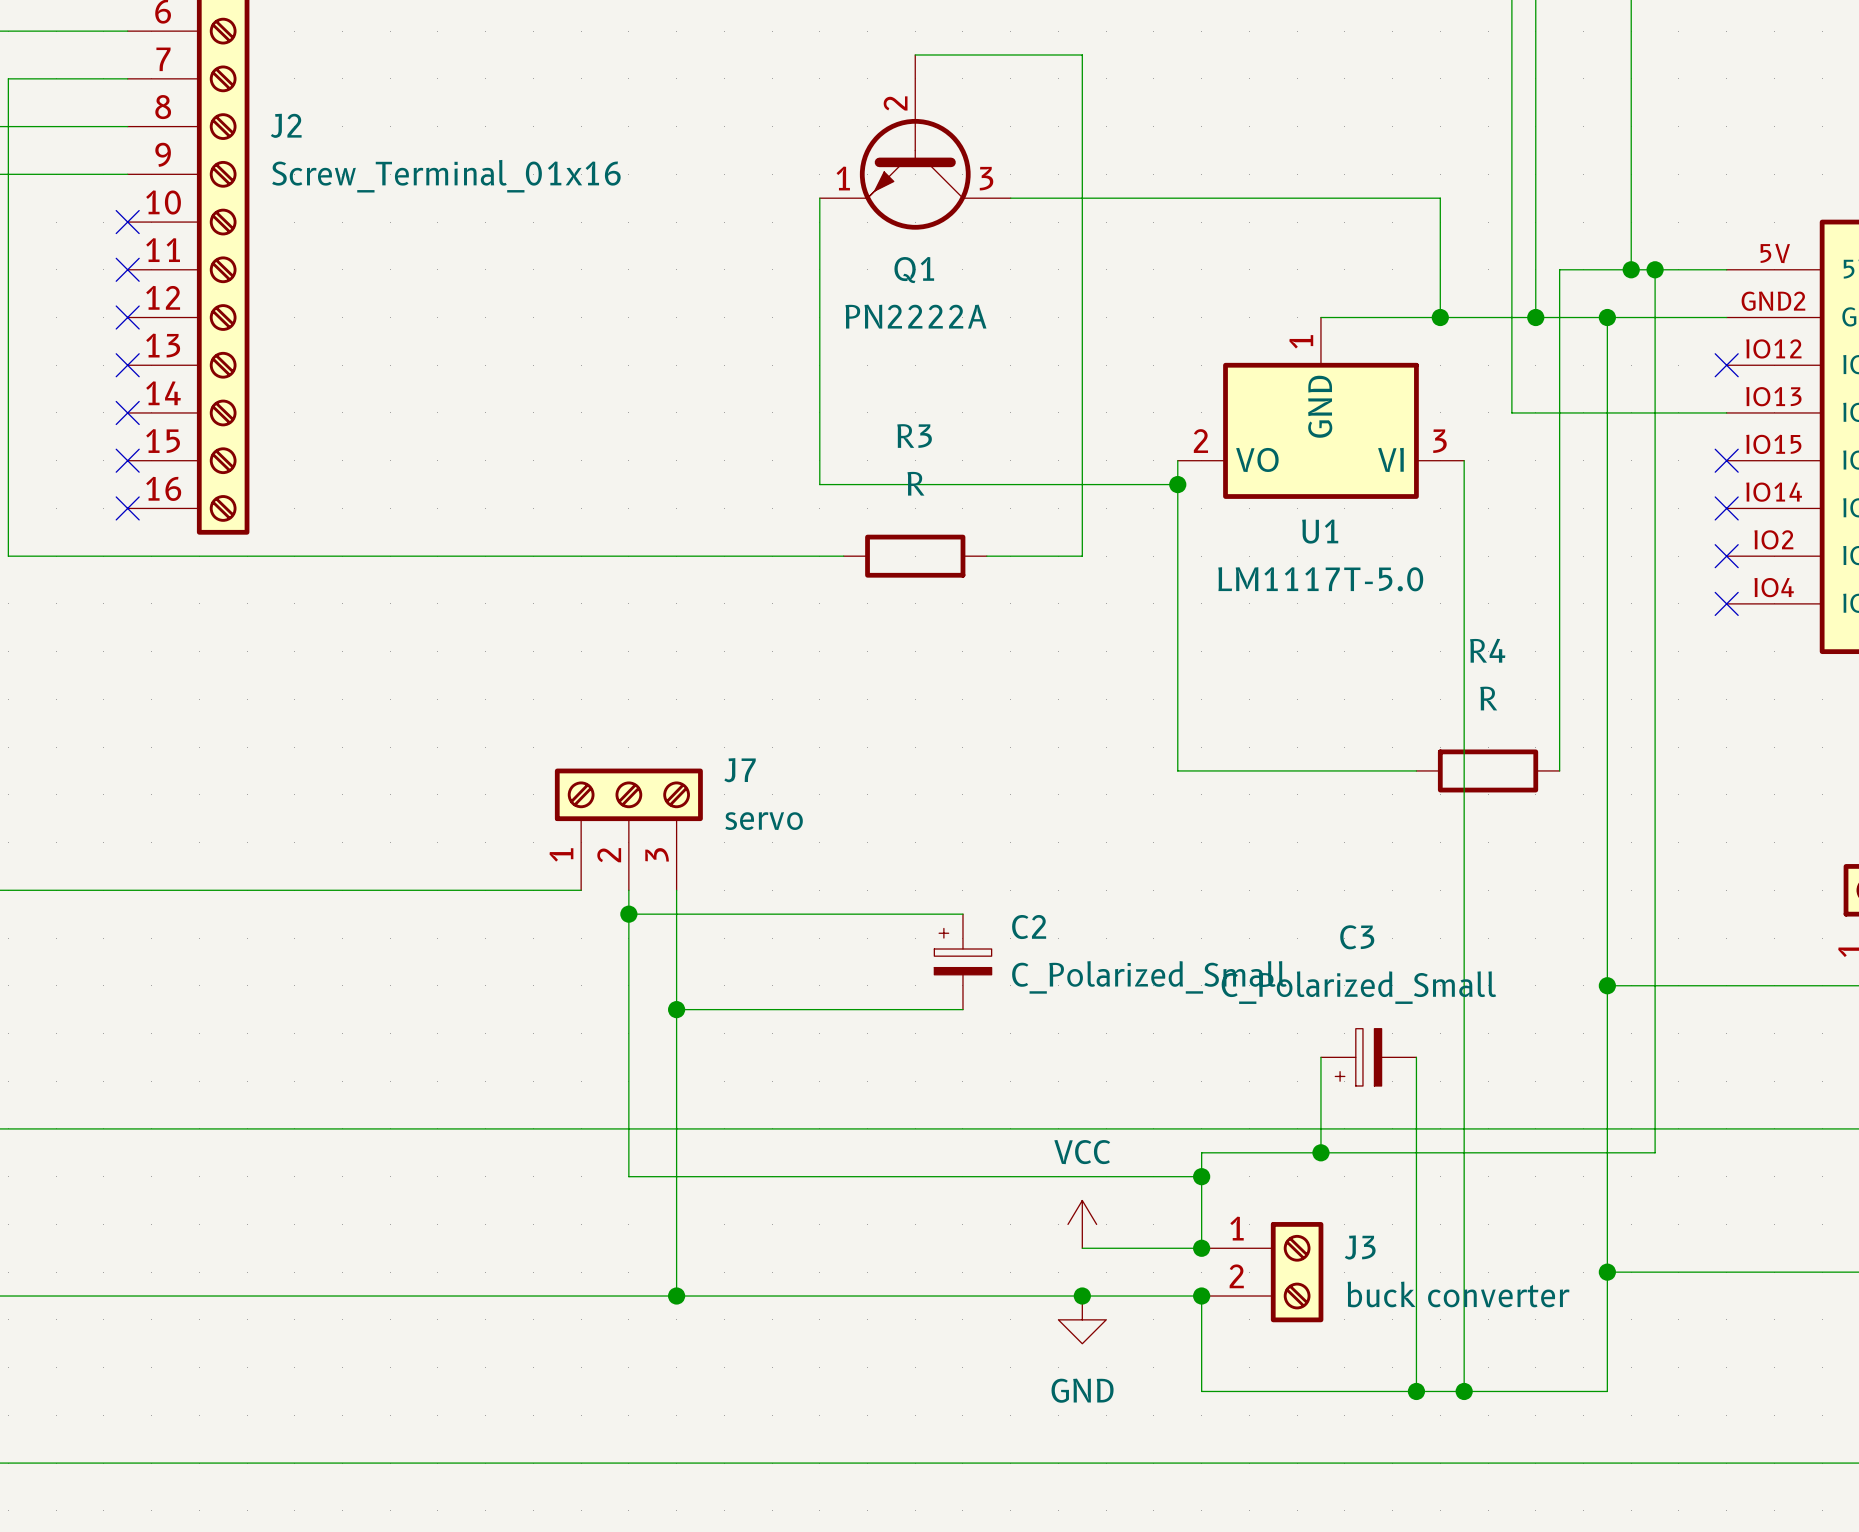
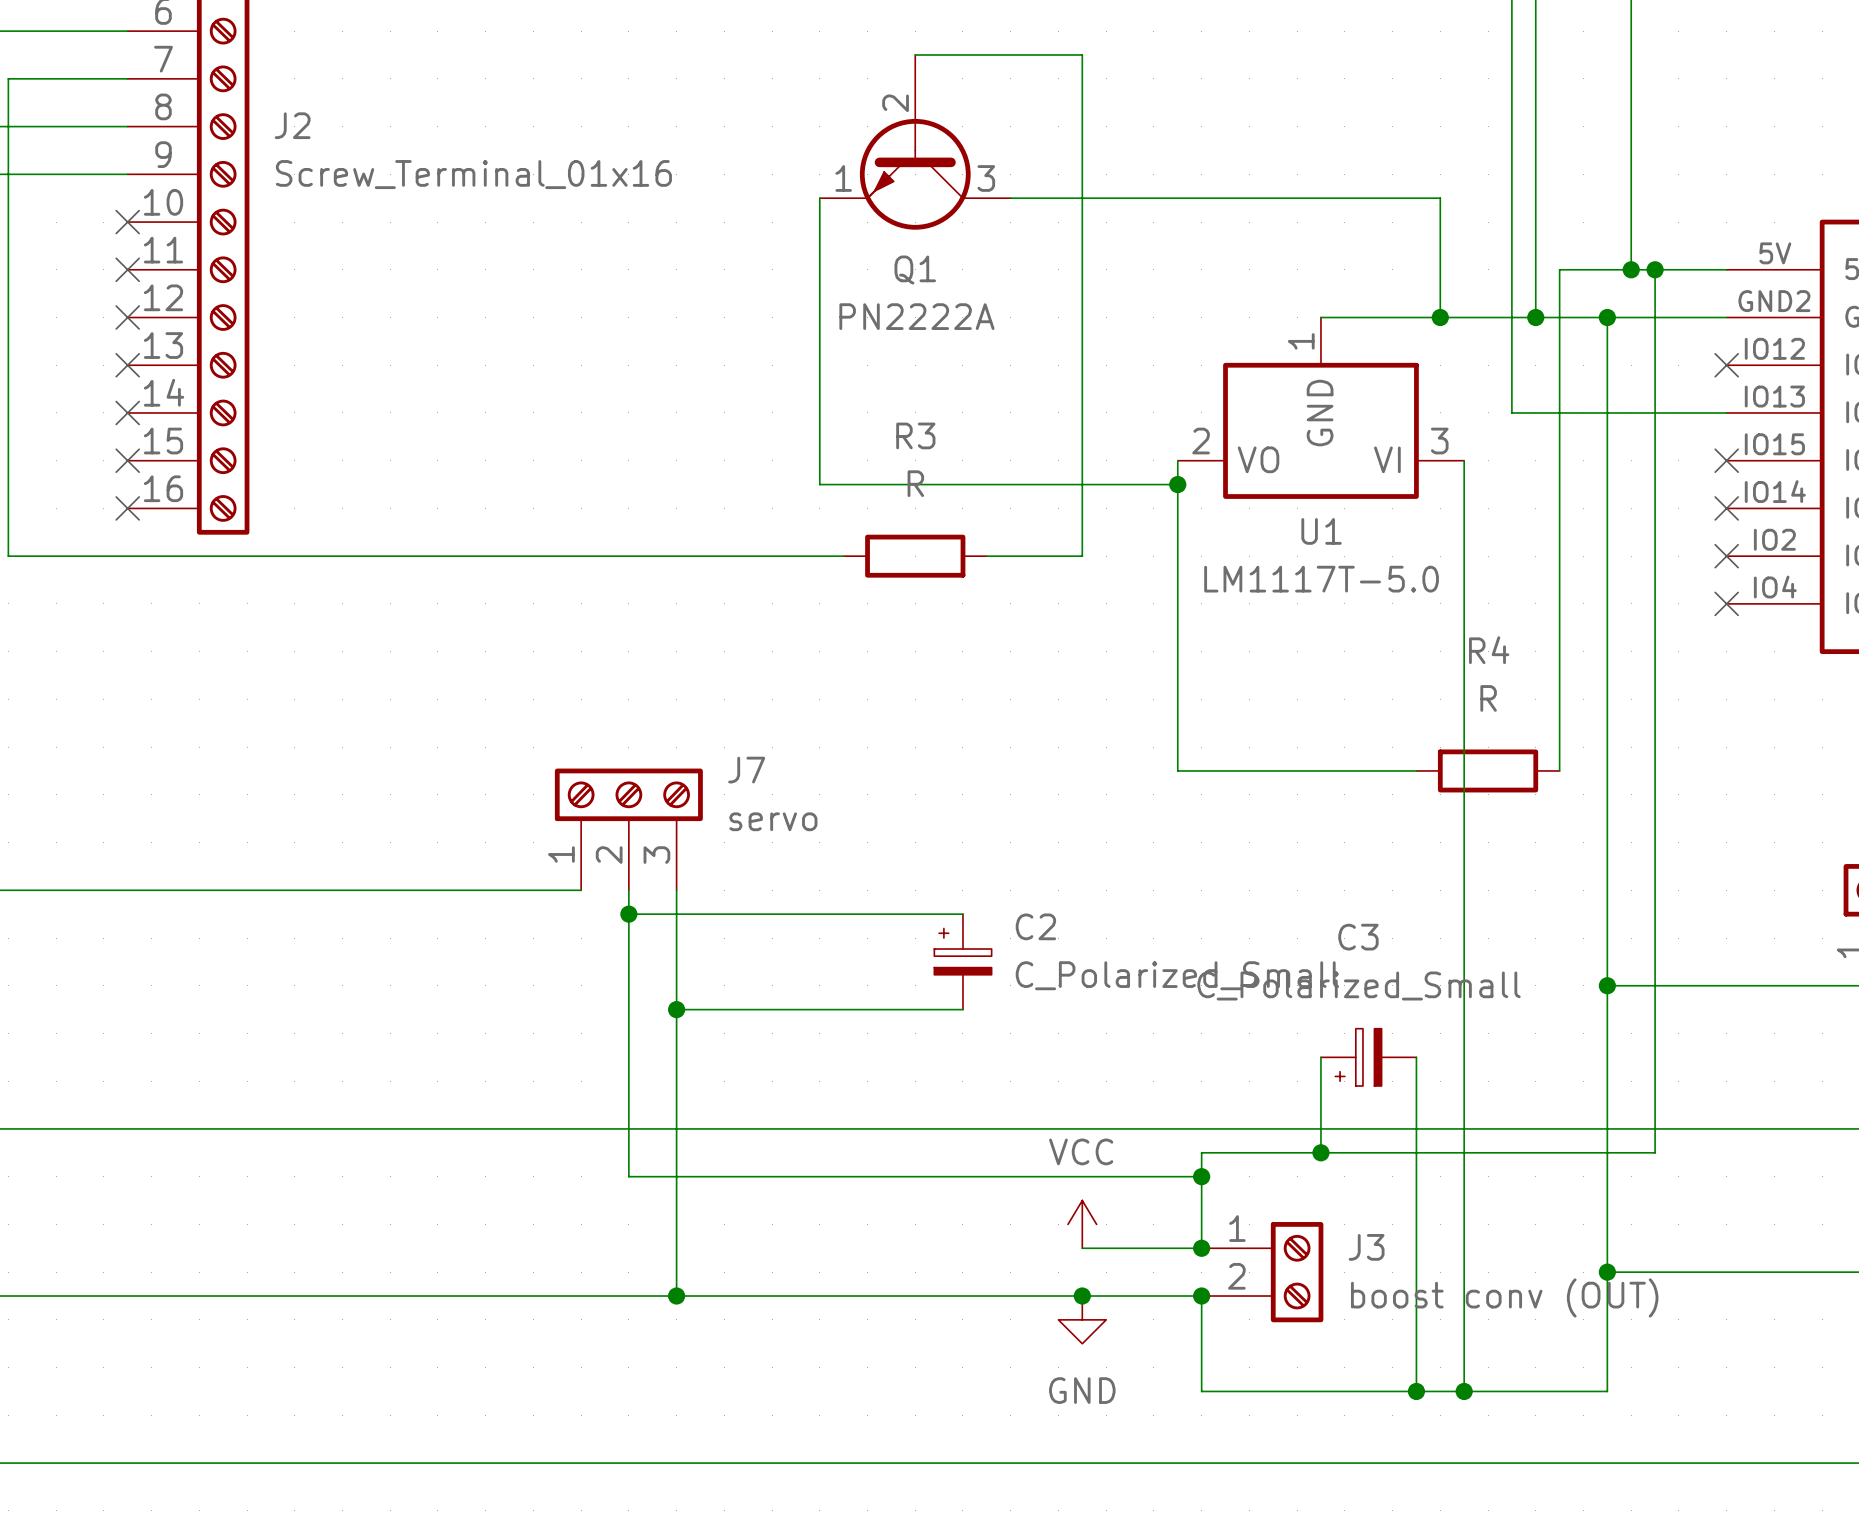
J3 value: buck converter (1458, 1294) -> boost conv (OUT) (1504, 1297)

